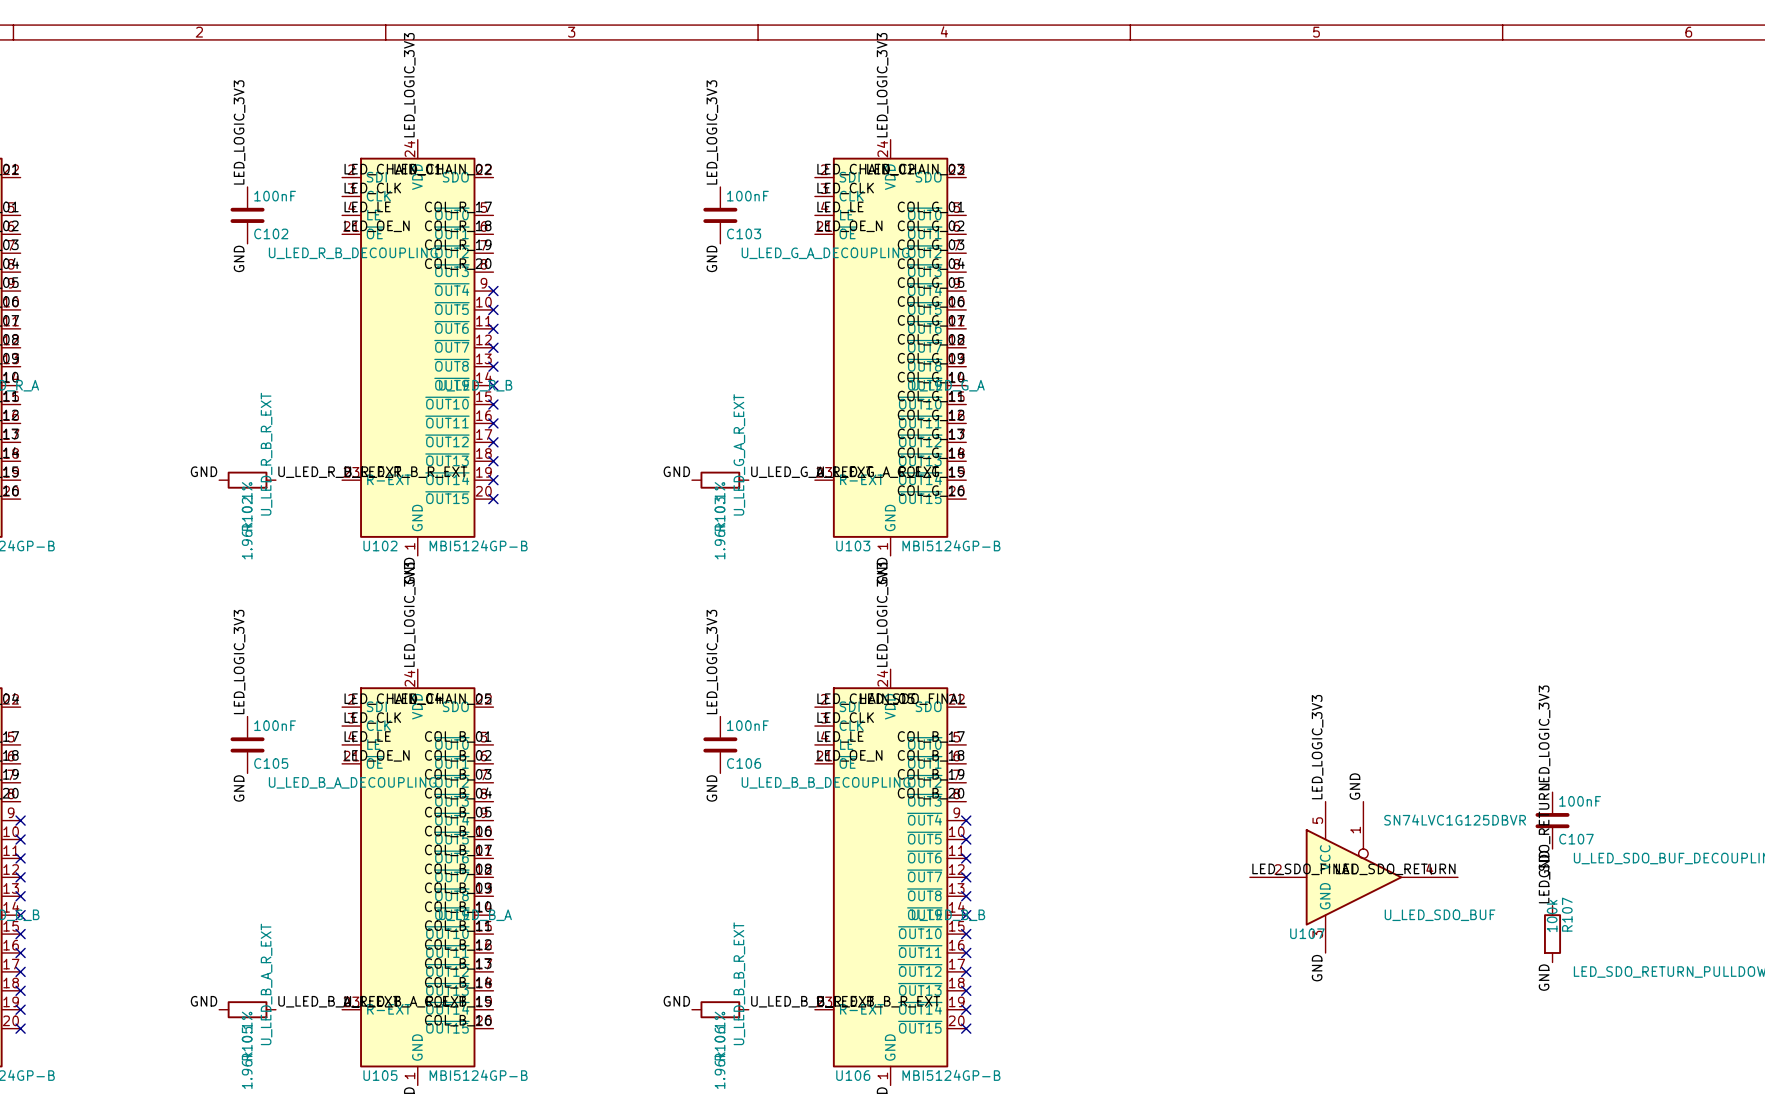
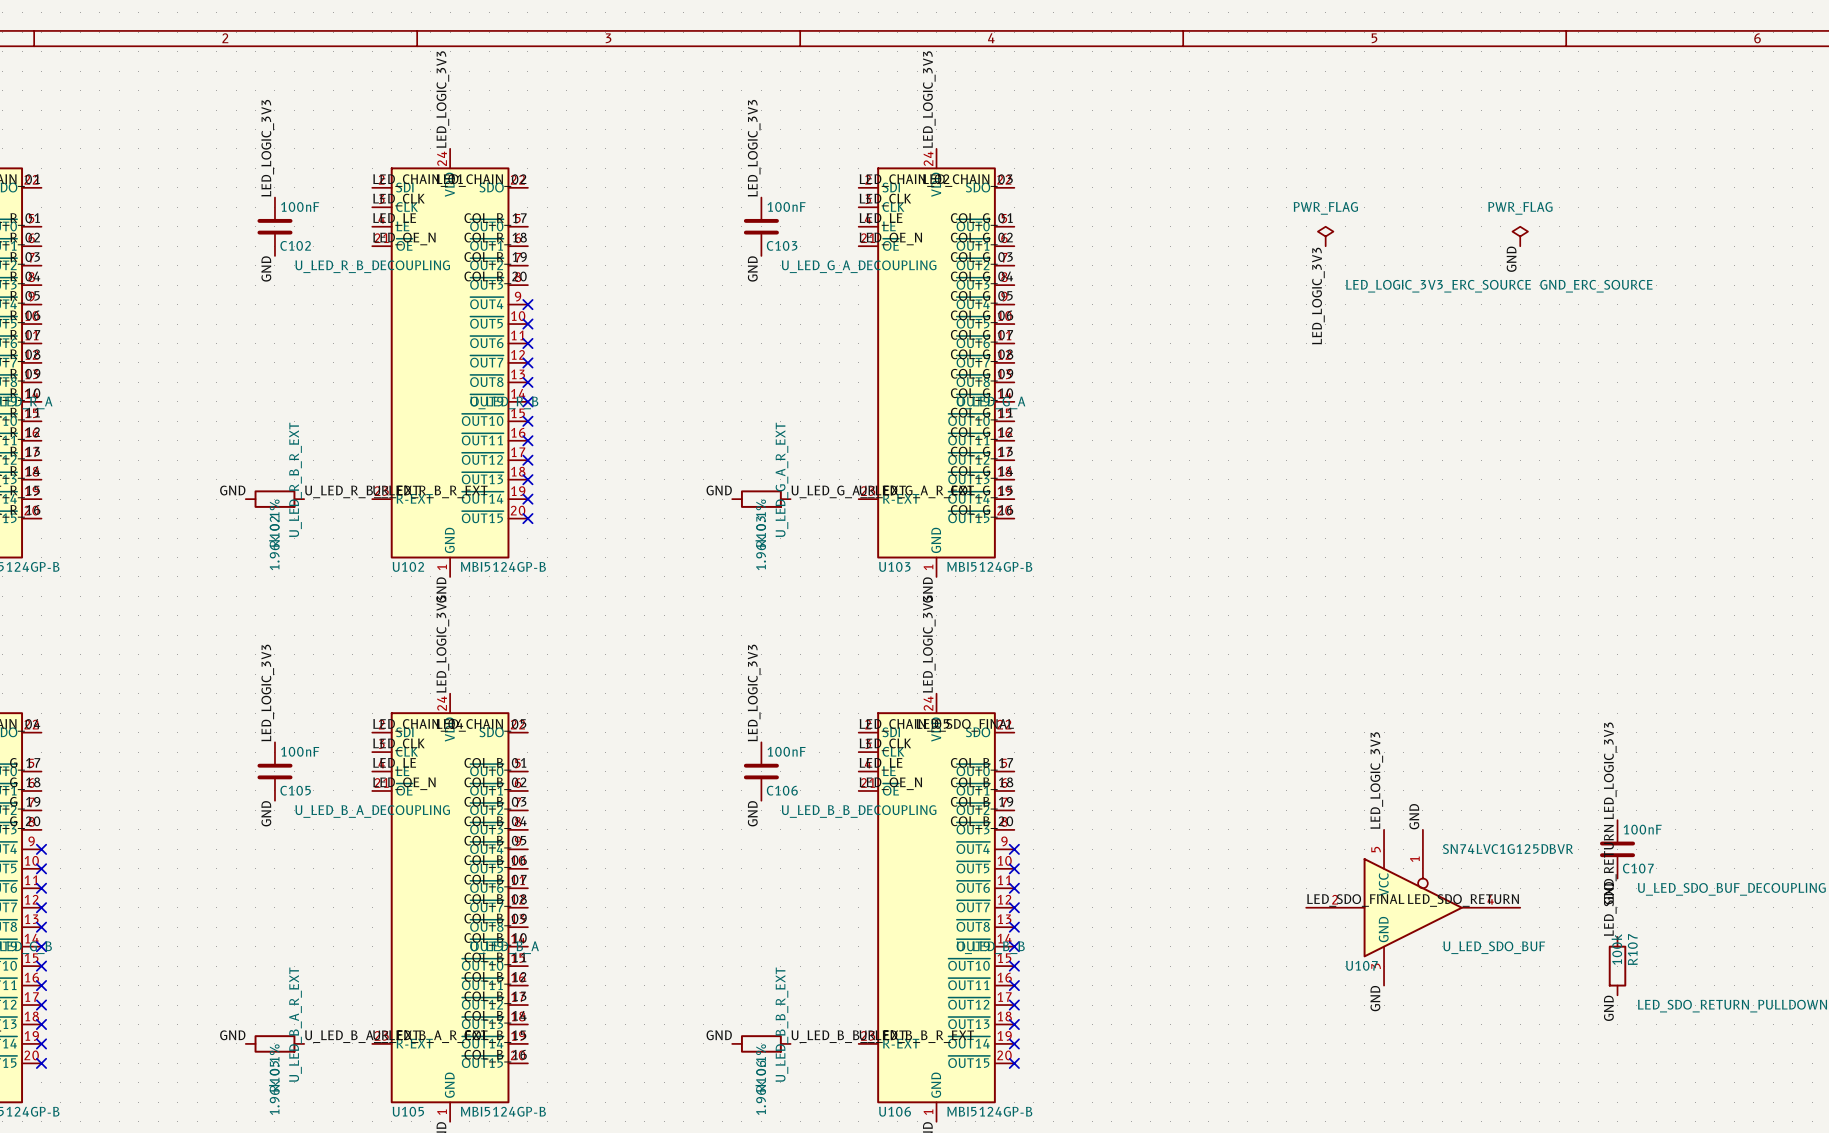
power symbol: none -> PWR_FLAG (1325, 236)
power symbol: none -> PWR_FLAG (1520, 236)
label: none -> GND (1511, 259)
label: none -> LED_LOGIC_3V3 (1318, 296)

